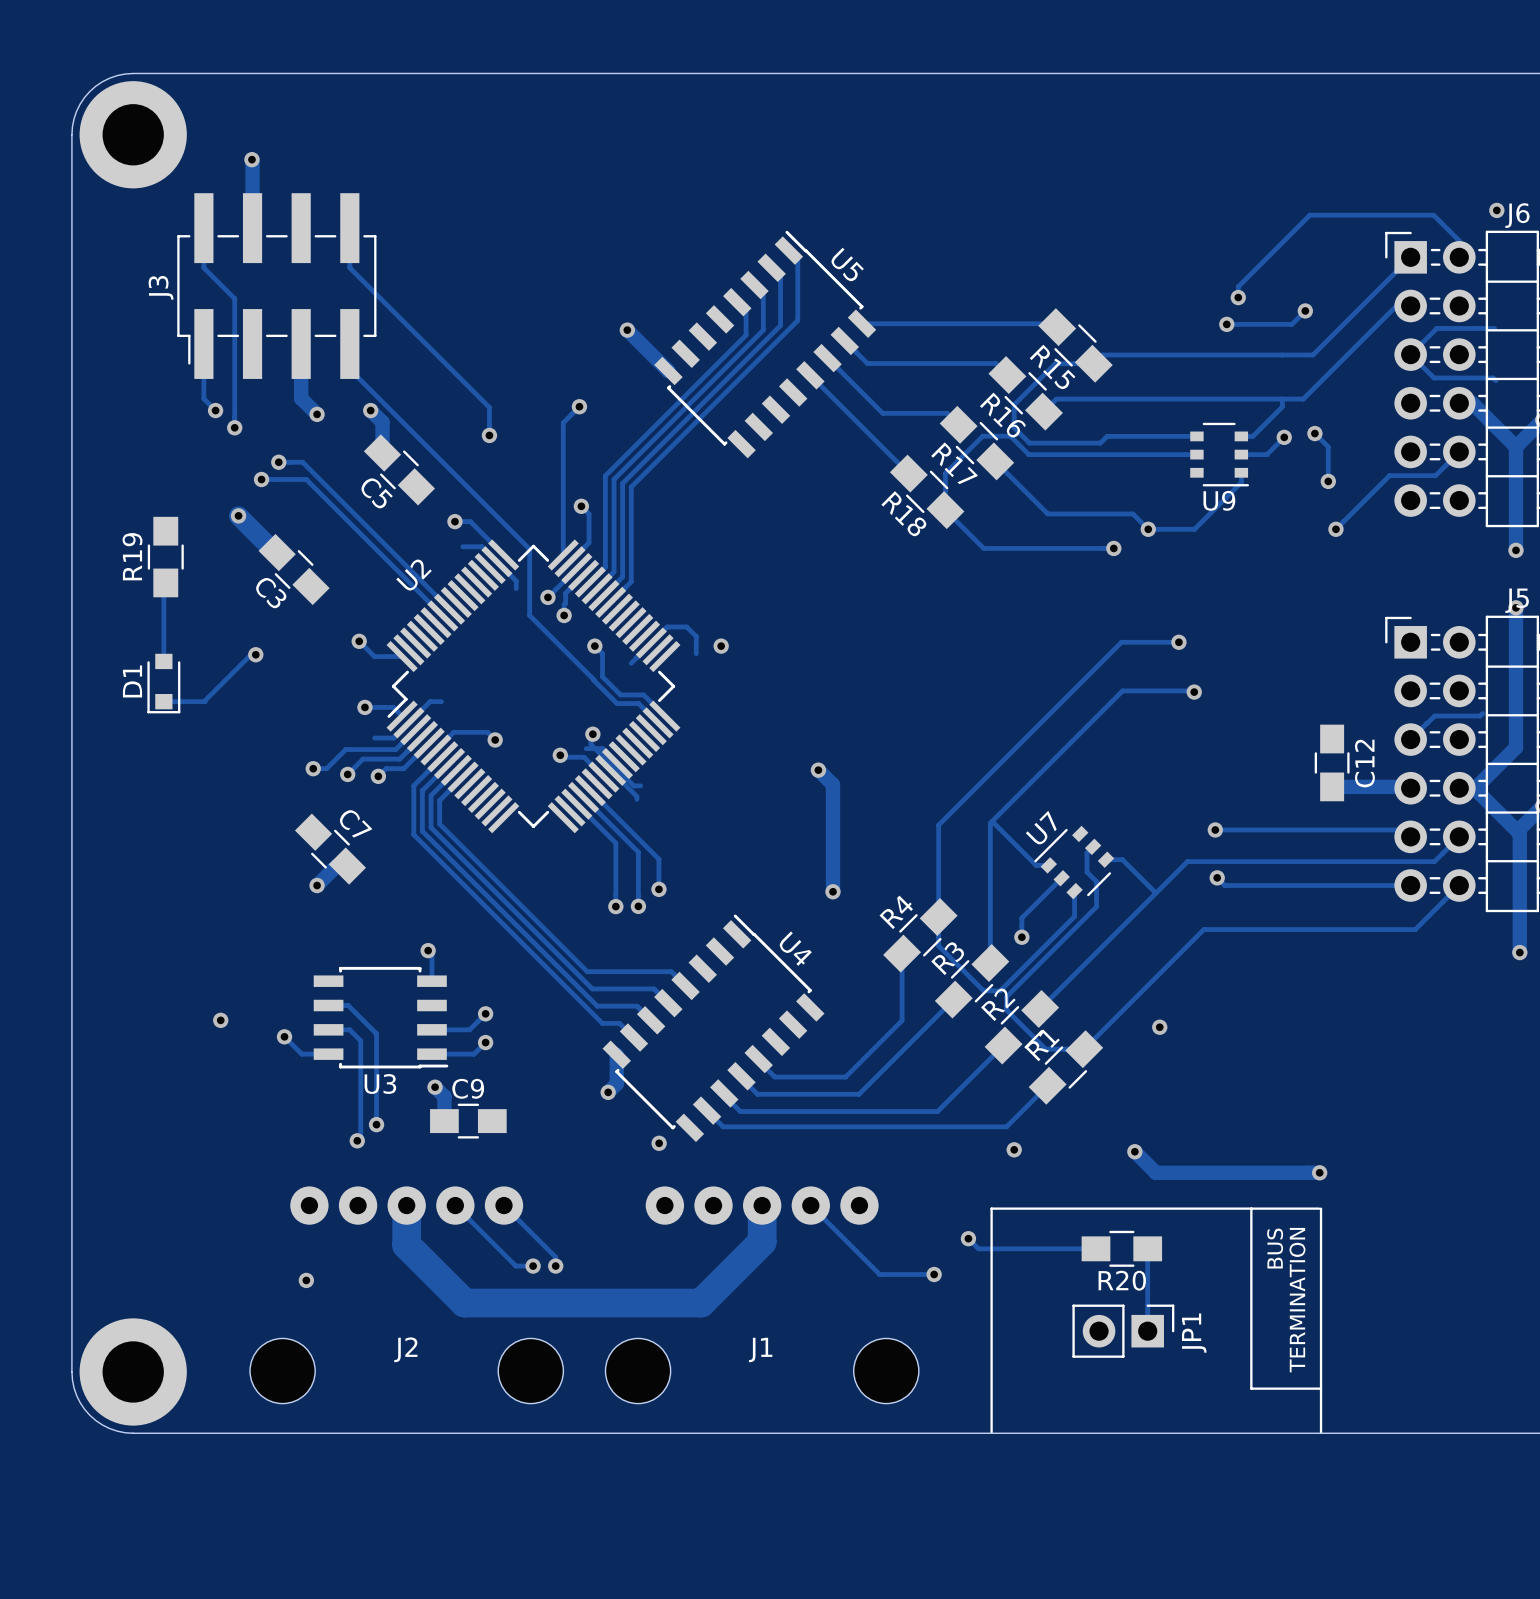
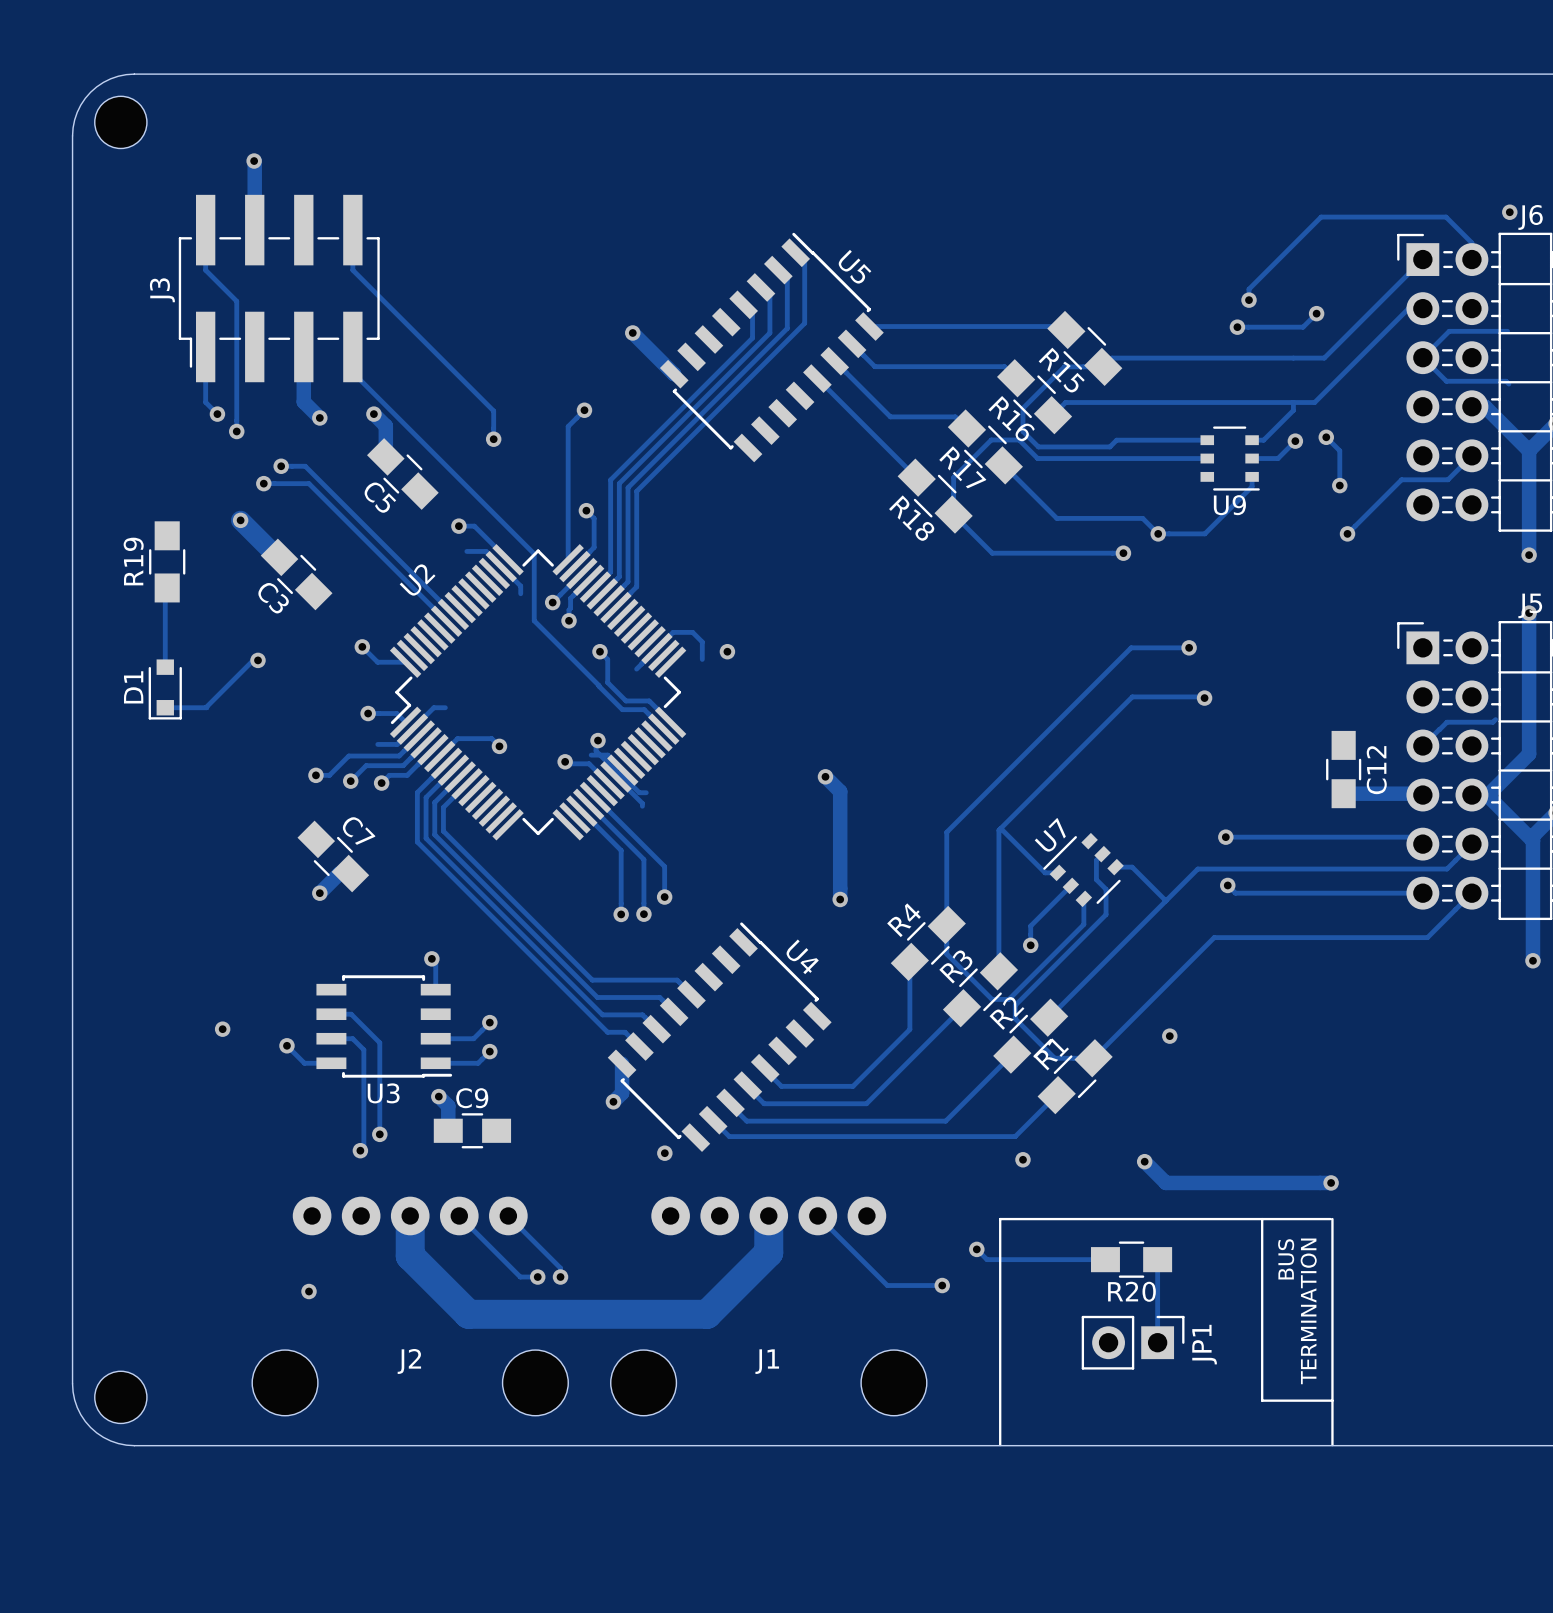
part footprint: [79, 81, 187, 189] -> [94, 96, 147, 149]
part footprint: [79, 1318, 187, 1426] -> [94, 1371, 147, 1424]

